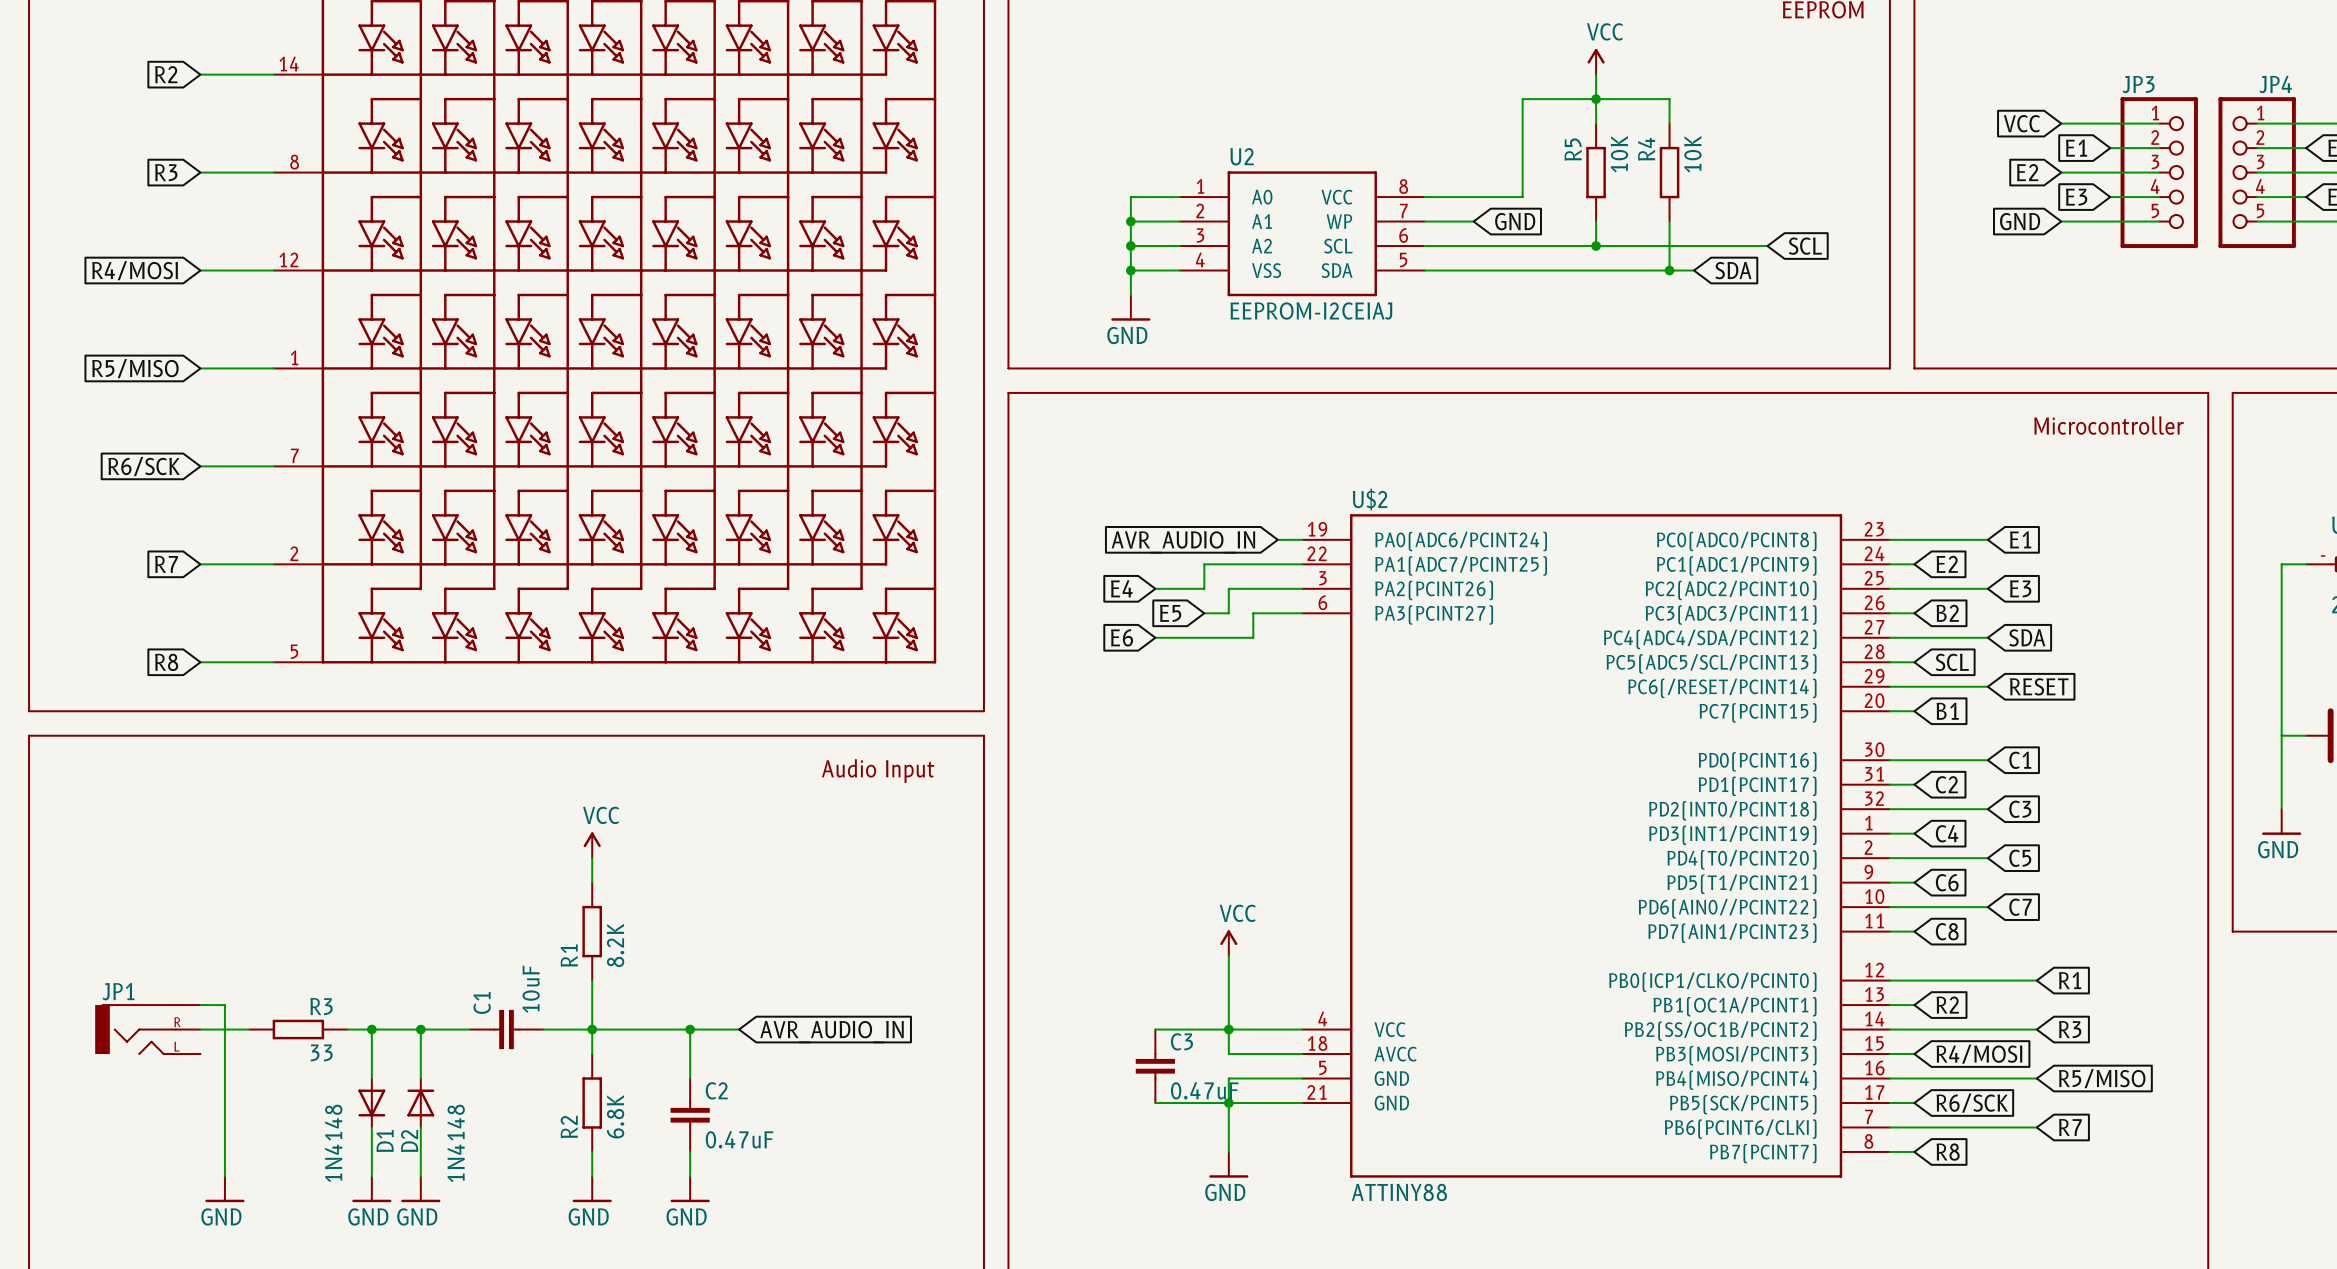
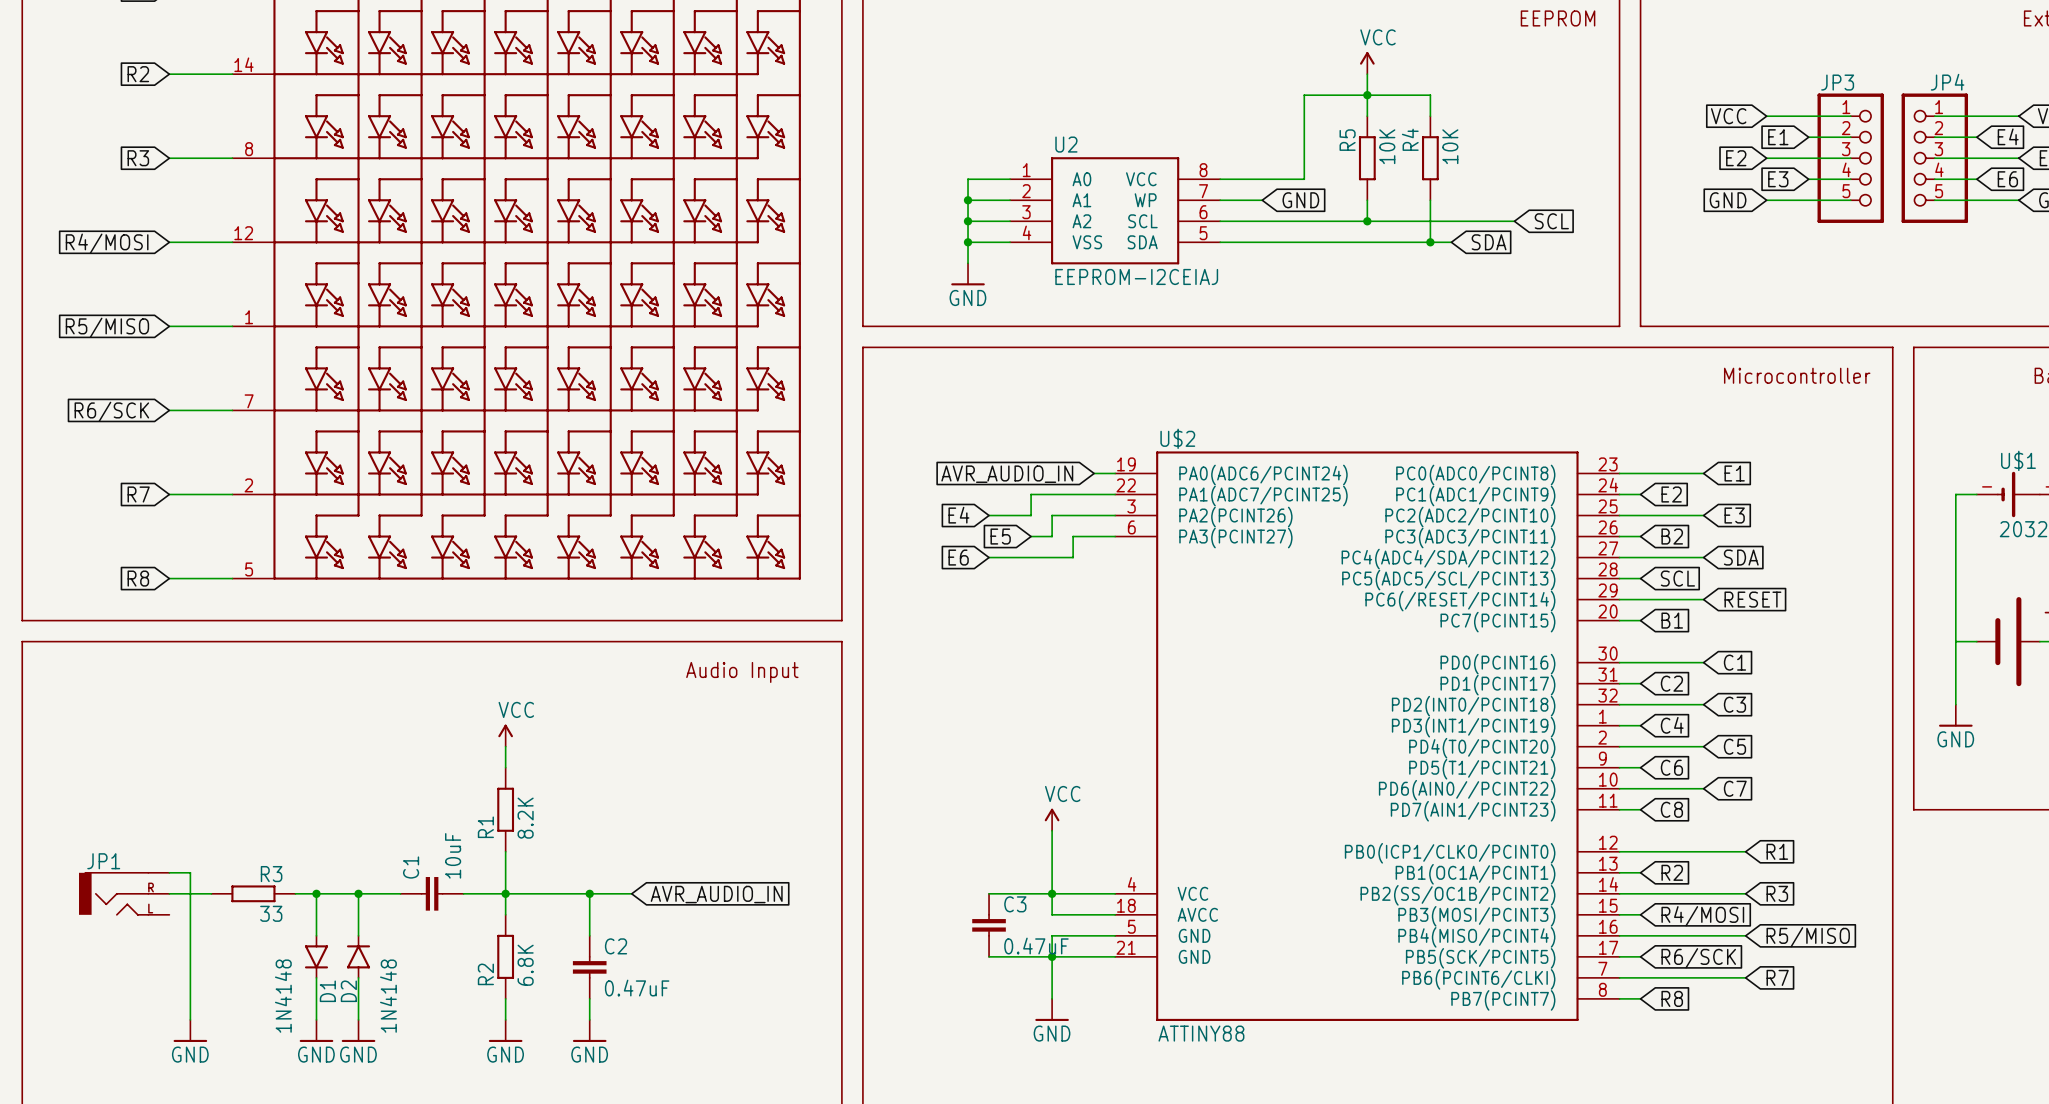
D1 symbol: [358, 1078, 386, 1128] -> [304, 935, 329, 979]
D2 symbol: [407, 1078, 435, 1128] -> [346, 935, 371, 979]

